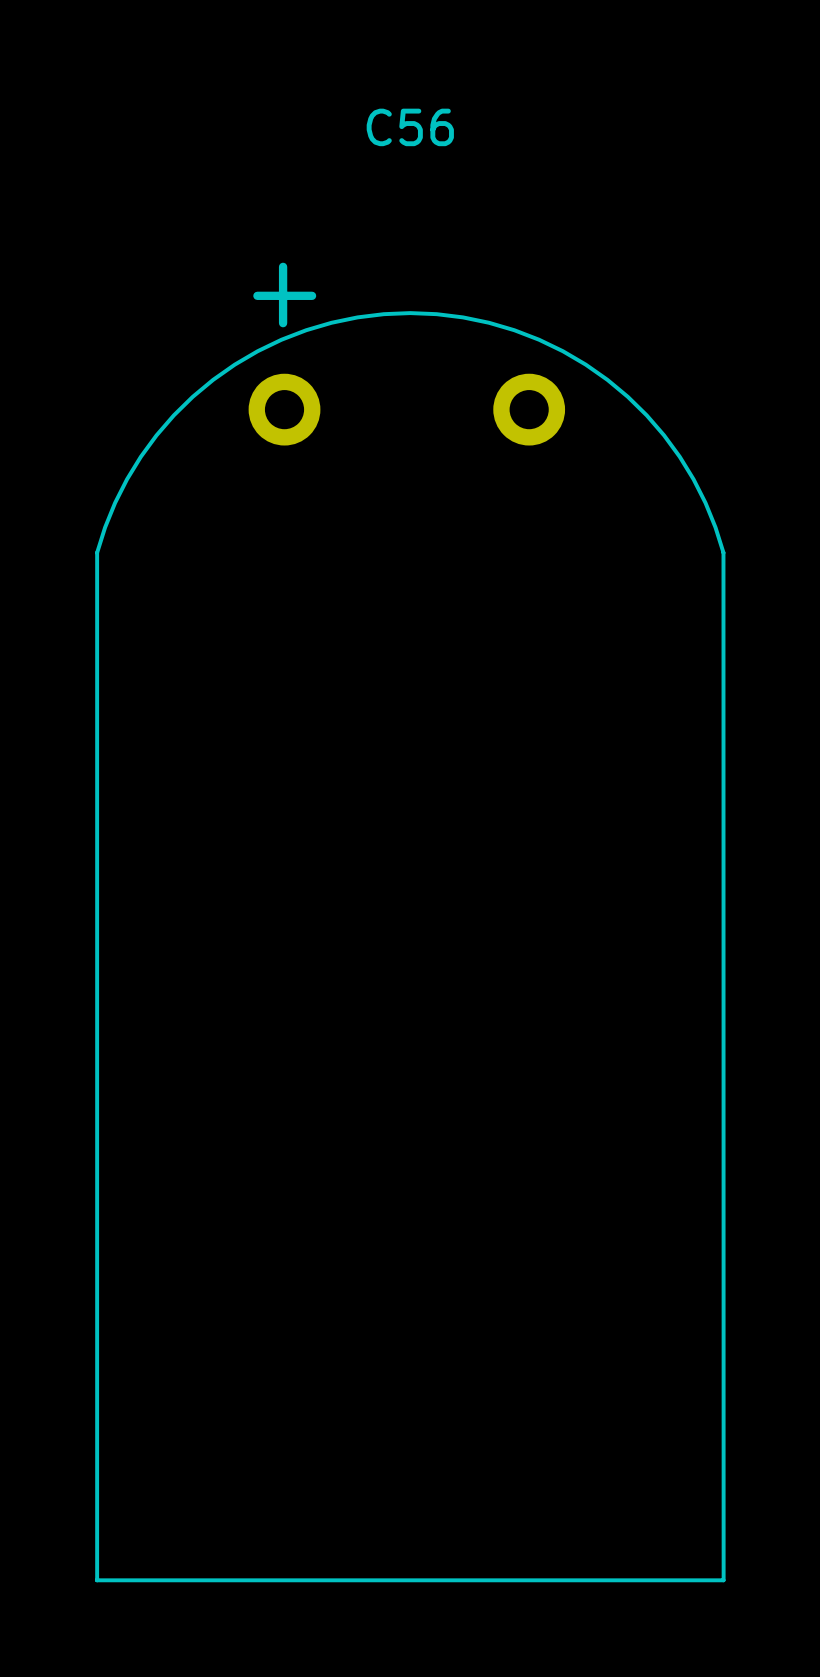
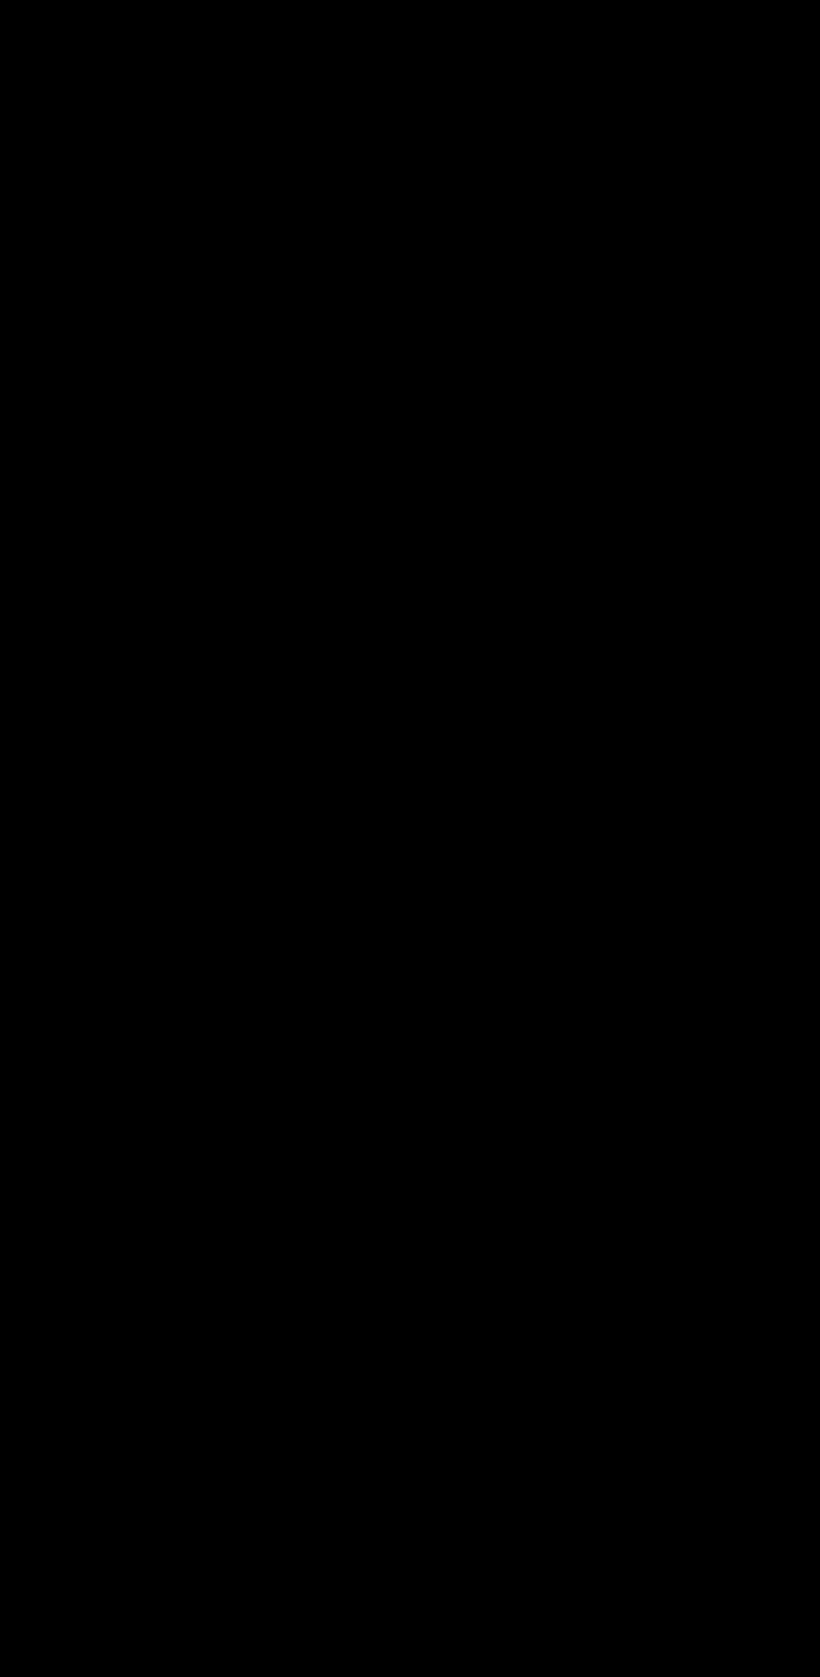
C56: (410, 922) -> none

